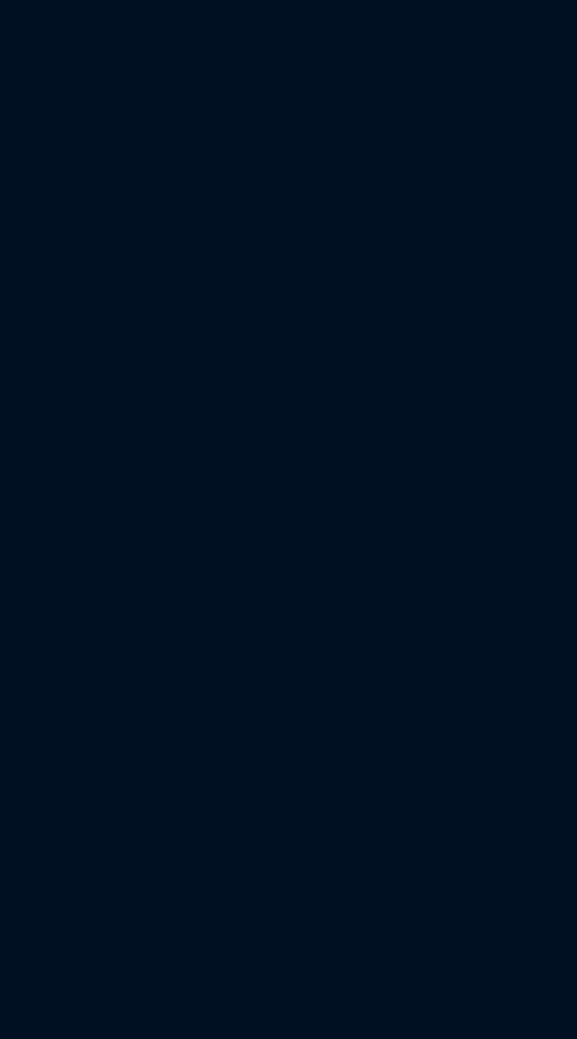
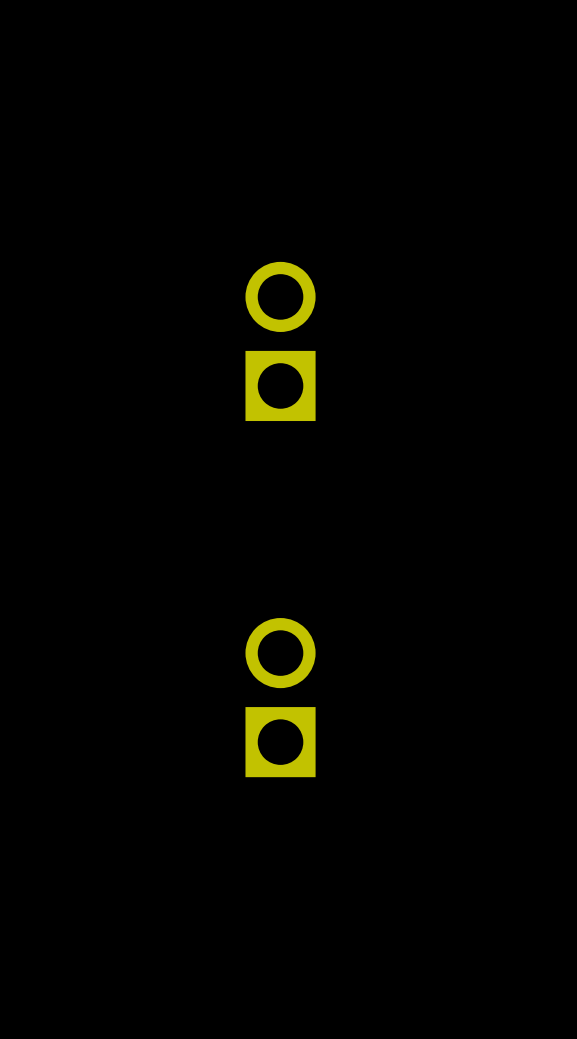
part: none -> (280, 341)
part: none -> (280, 697)

